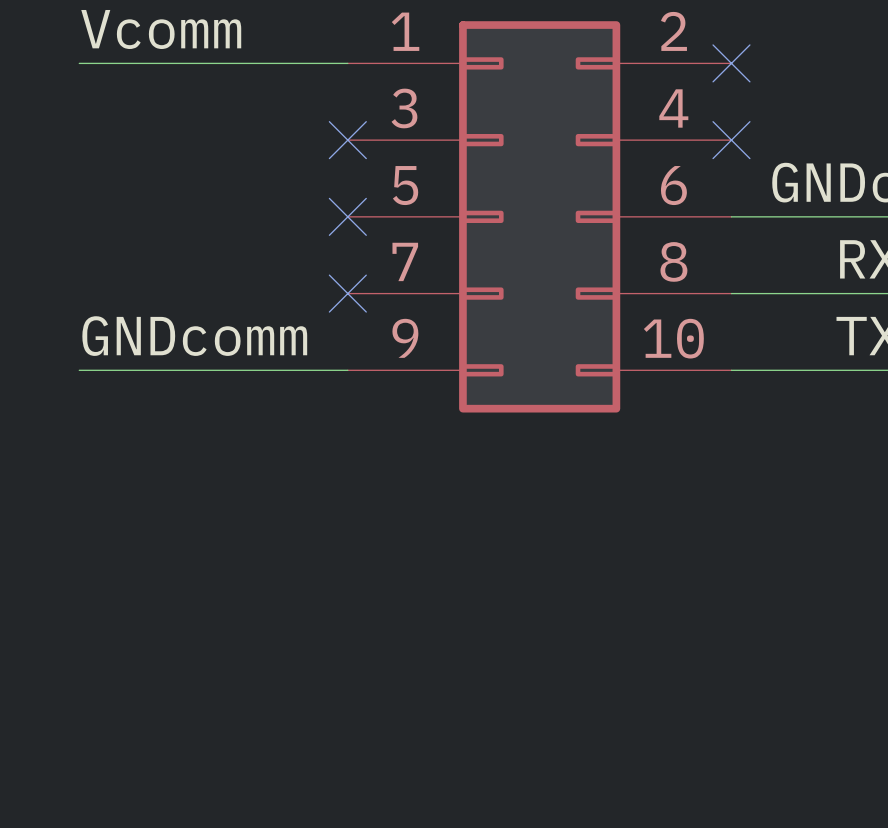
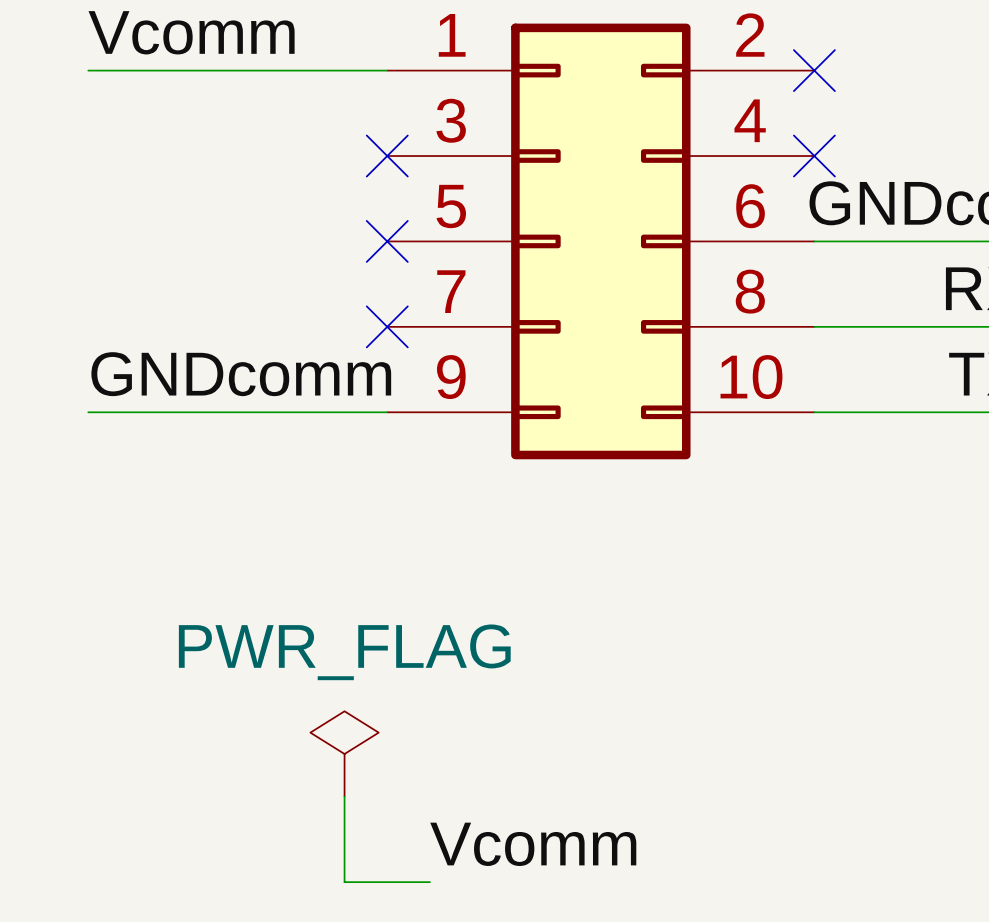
power symbol: none -> PWR_FLAG (344, 754)
wire: none -> (344, 796) (344, 882) (429, 882)
label: none -> Vcomm (533, 844)

